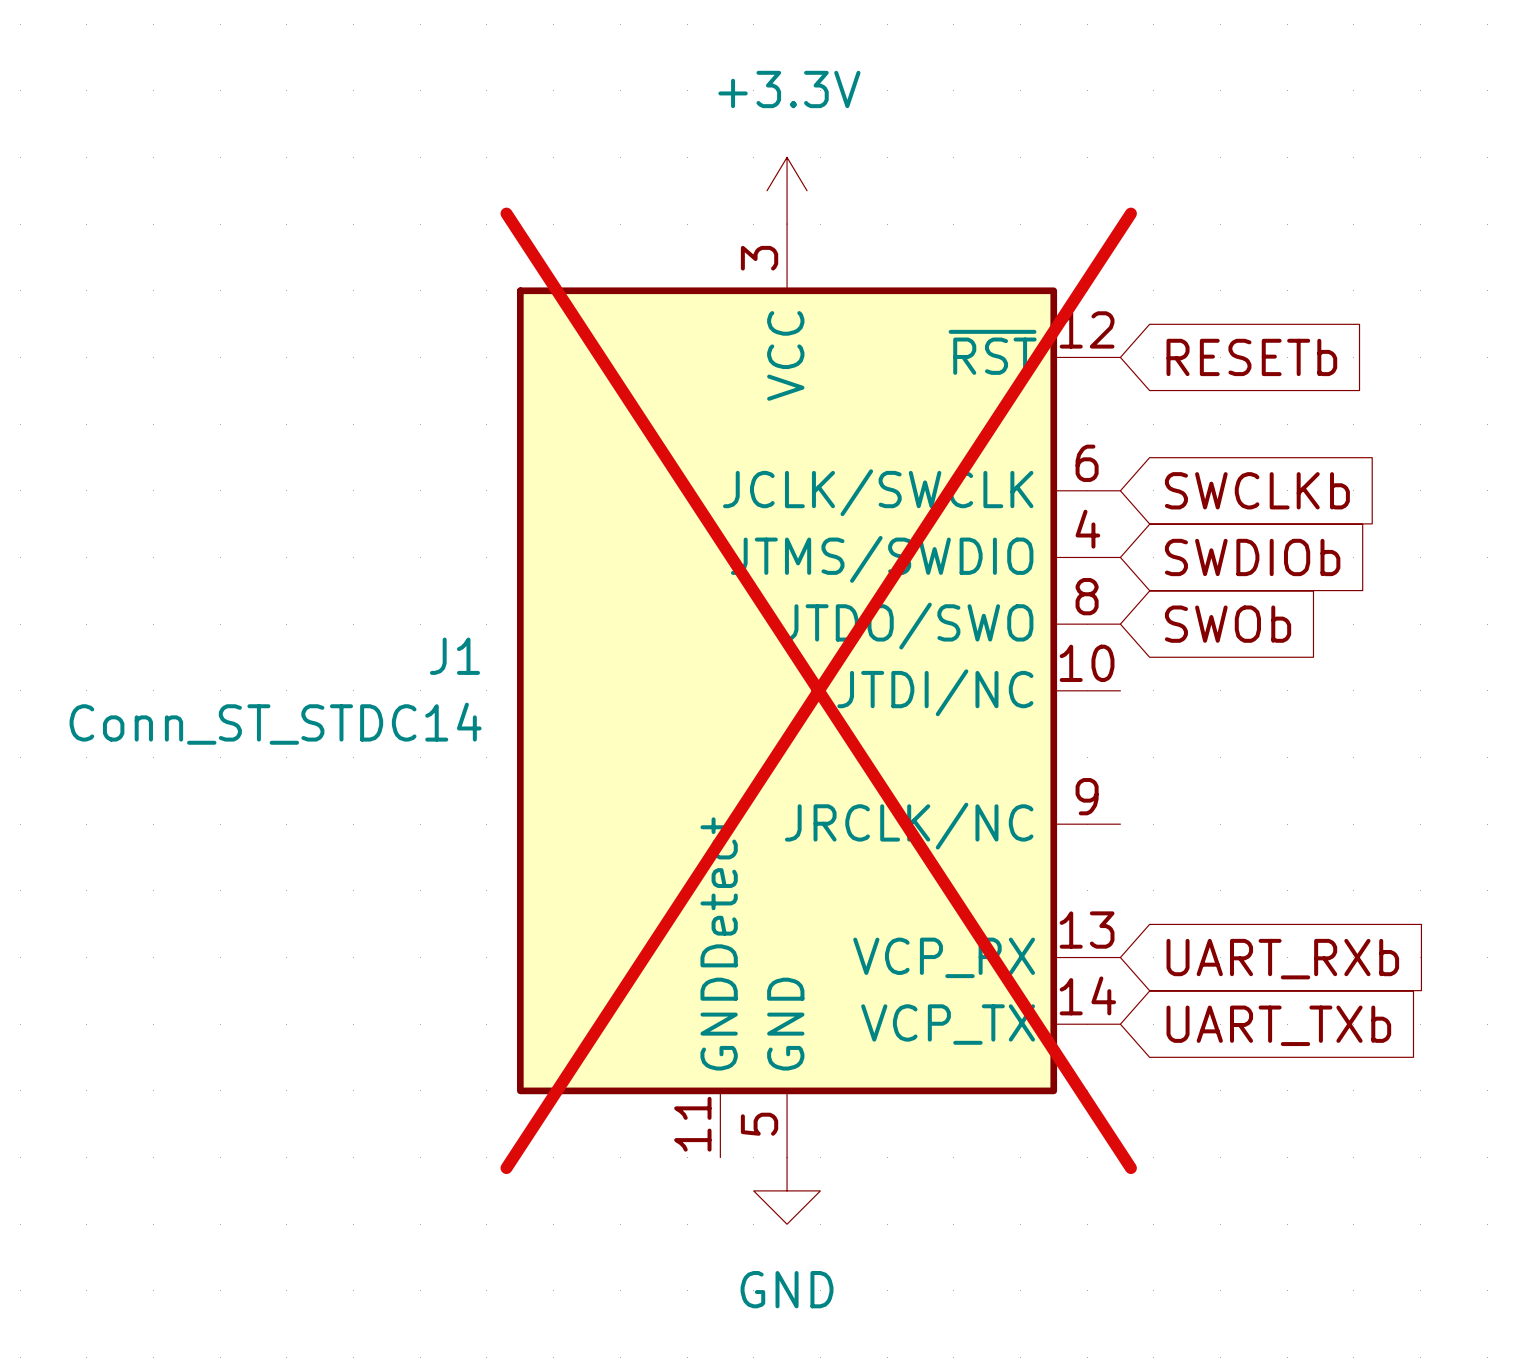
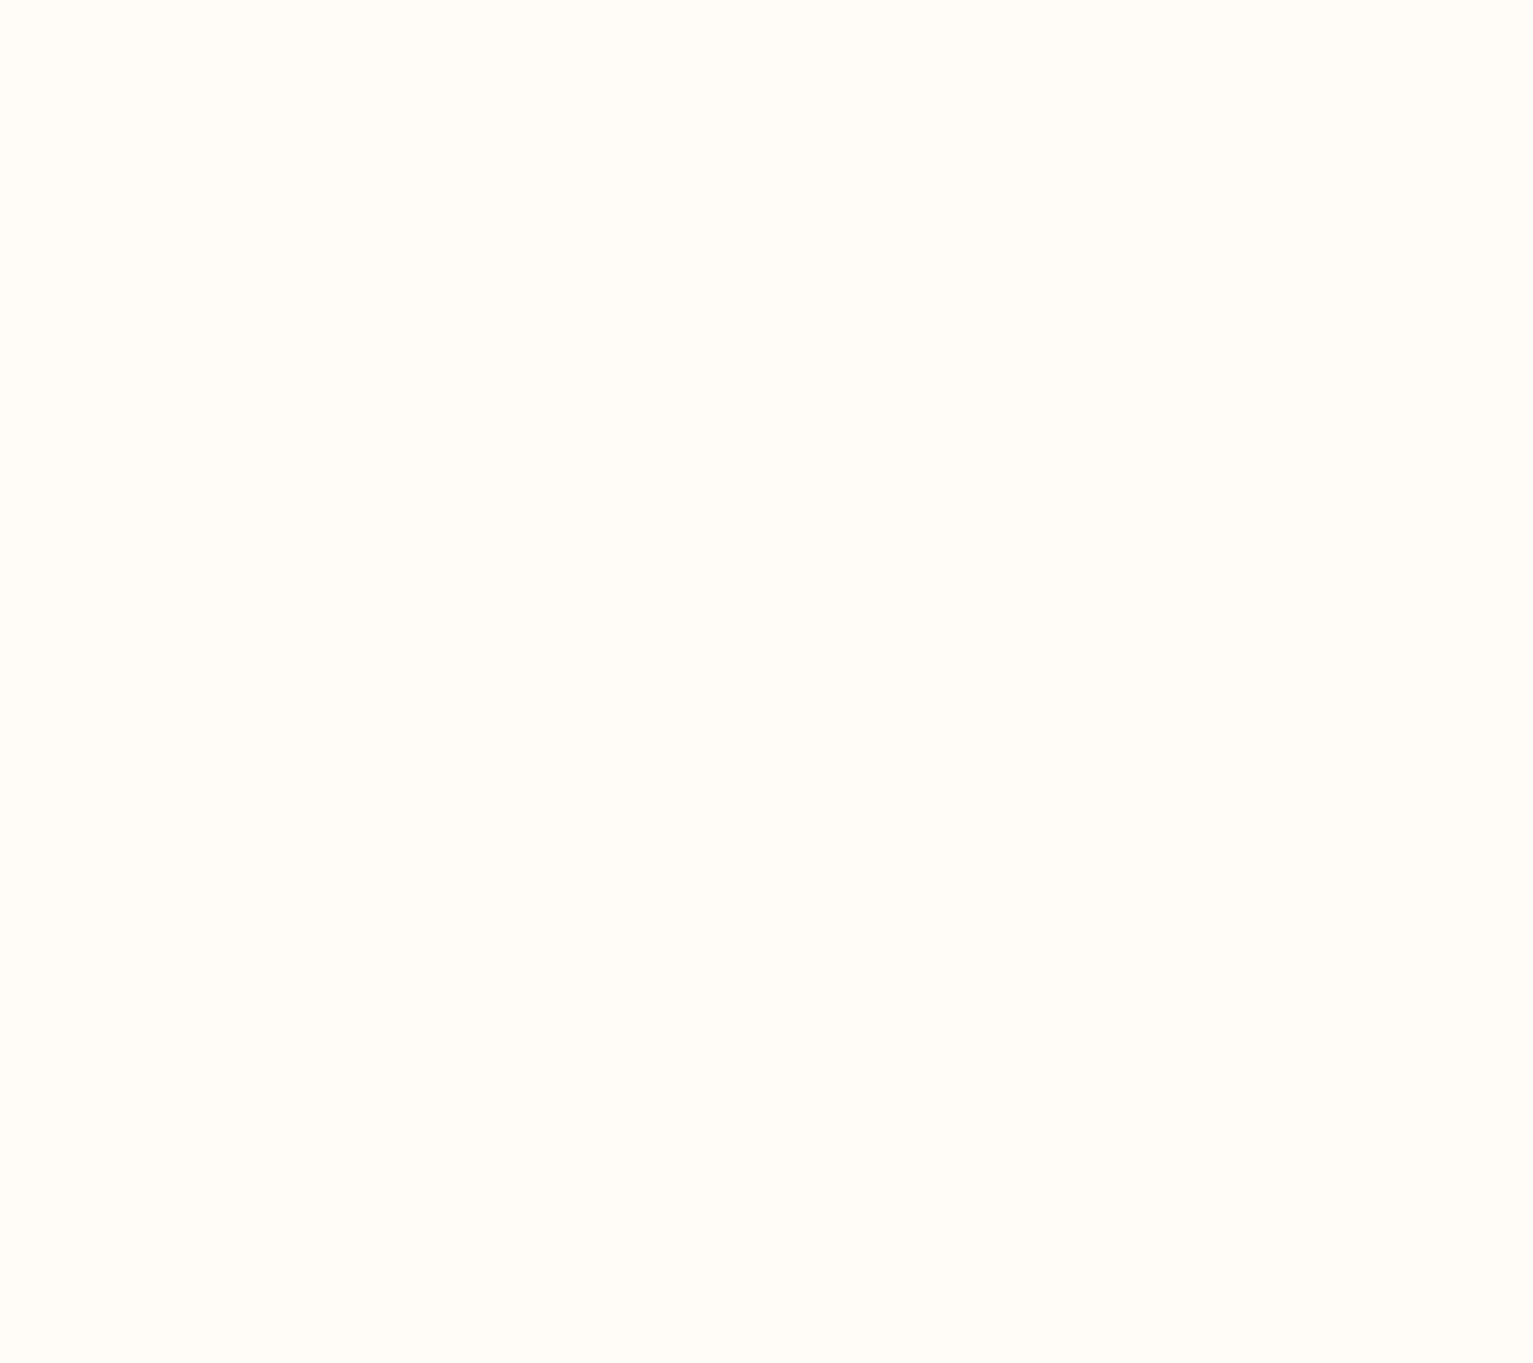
power symbol: +3.3V (787, 190) -> none
global label: RESETb (1251, 357) -> none
global label: SWCLKb (1257, 490) -> none
global label: SWDIOb (1252, 557) -> none
global label: SWOb (1228, 624) -> none
J1: Conn_ST_STDC14 (818, 690) -> none
global label: UART_RXb (1282, 959) -> none
global label: UART_TXb (1278, 1025) -> none
power symbol: GND (787, 1190) -> none

